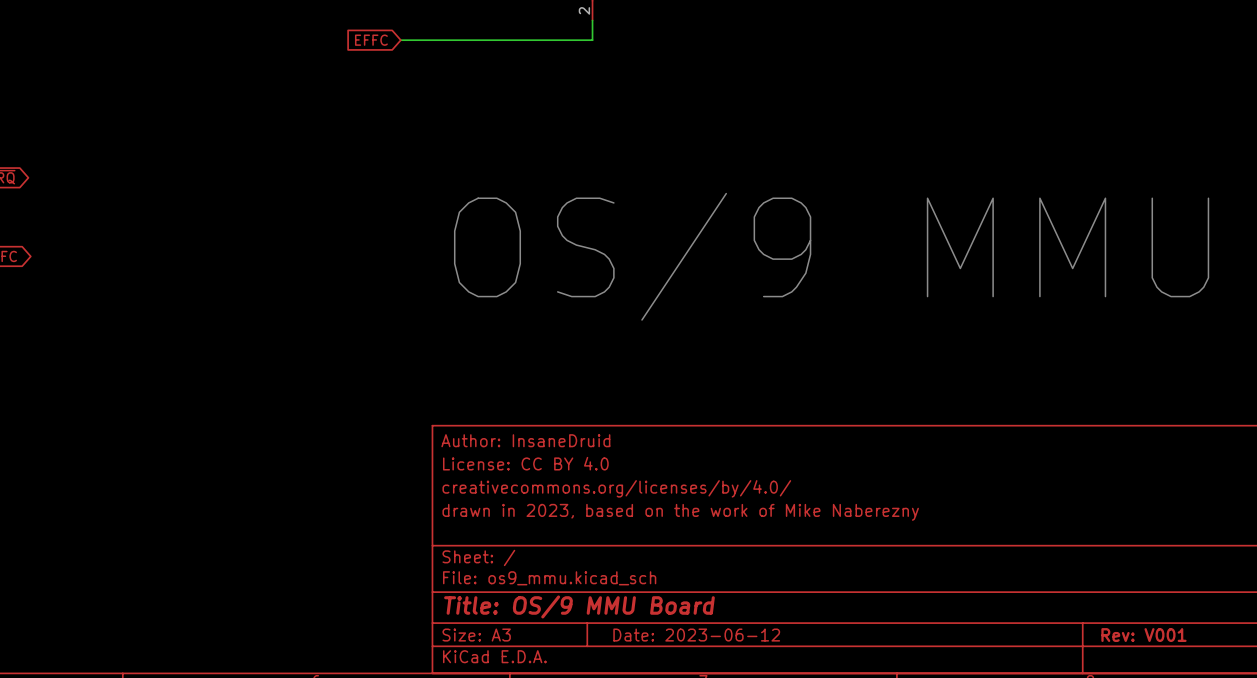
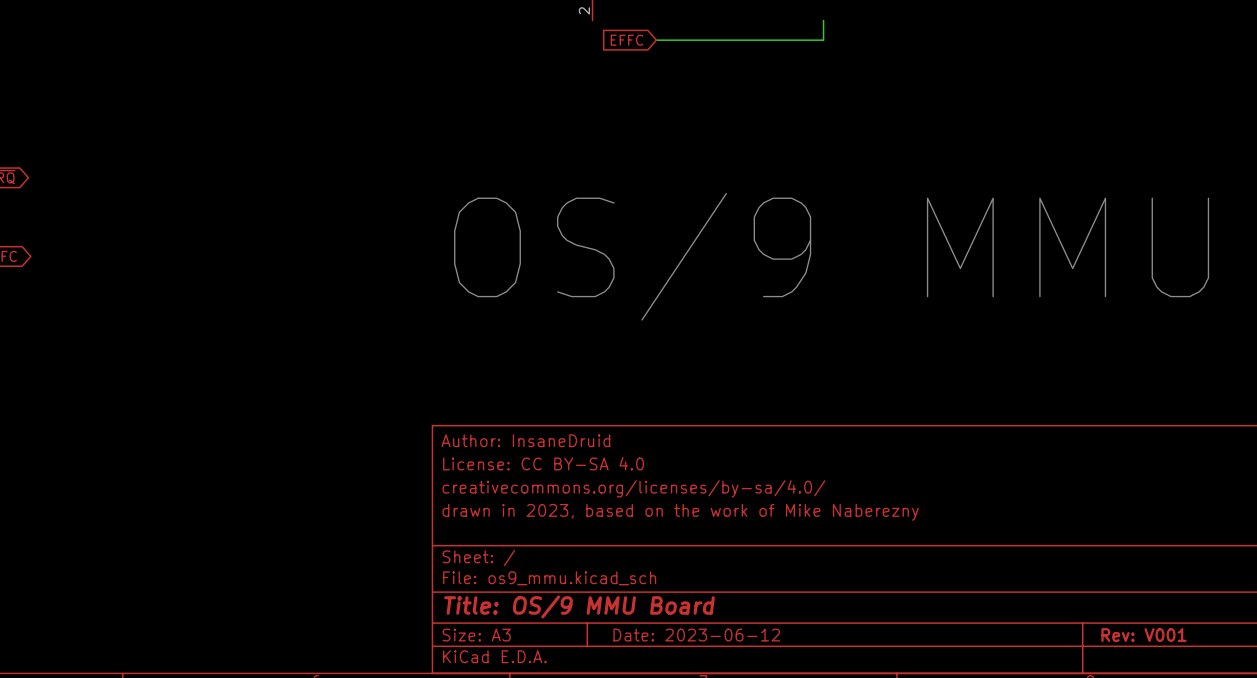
wire: (592, 20) (592, 40) (400, 40) -> none
wire: none -> (823, 20) (823, 40) (656, 40)
global label: EFFC (371, 40) -> none
global label: none -> EFFC (627, 40)
title block: License: CC BY 4.0 (525, 463) -> License: CC BY-SA 4.0 (543, 463)
title block: creativecommons.org/licenses/by/4.0/ (616, 488) -> creativecommons.org/licenses/by-sa/4.0/ (633, 488)

